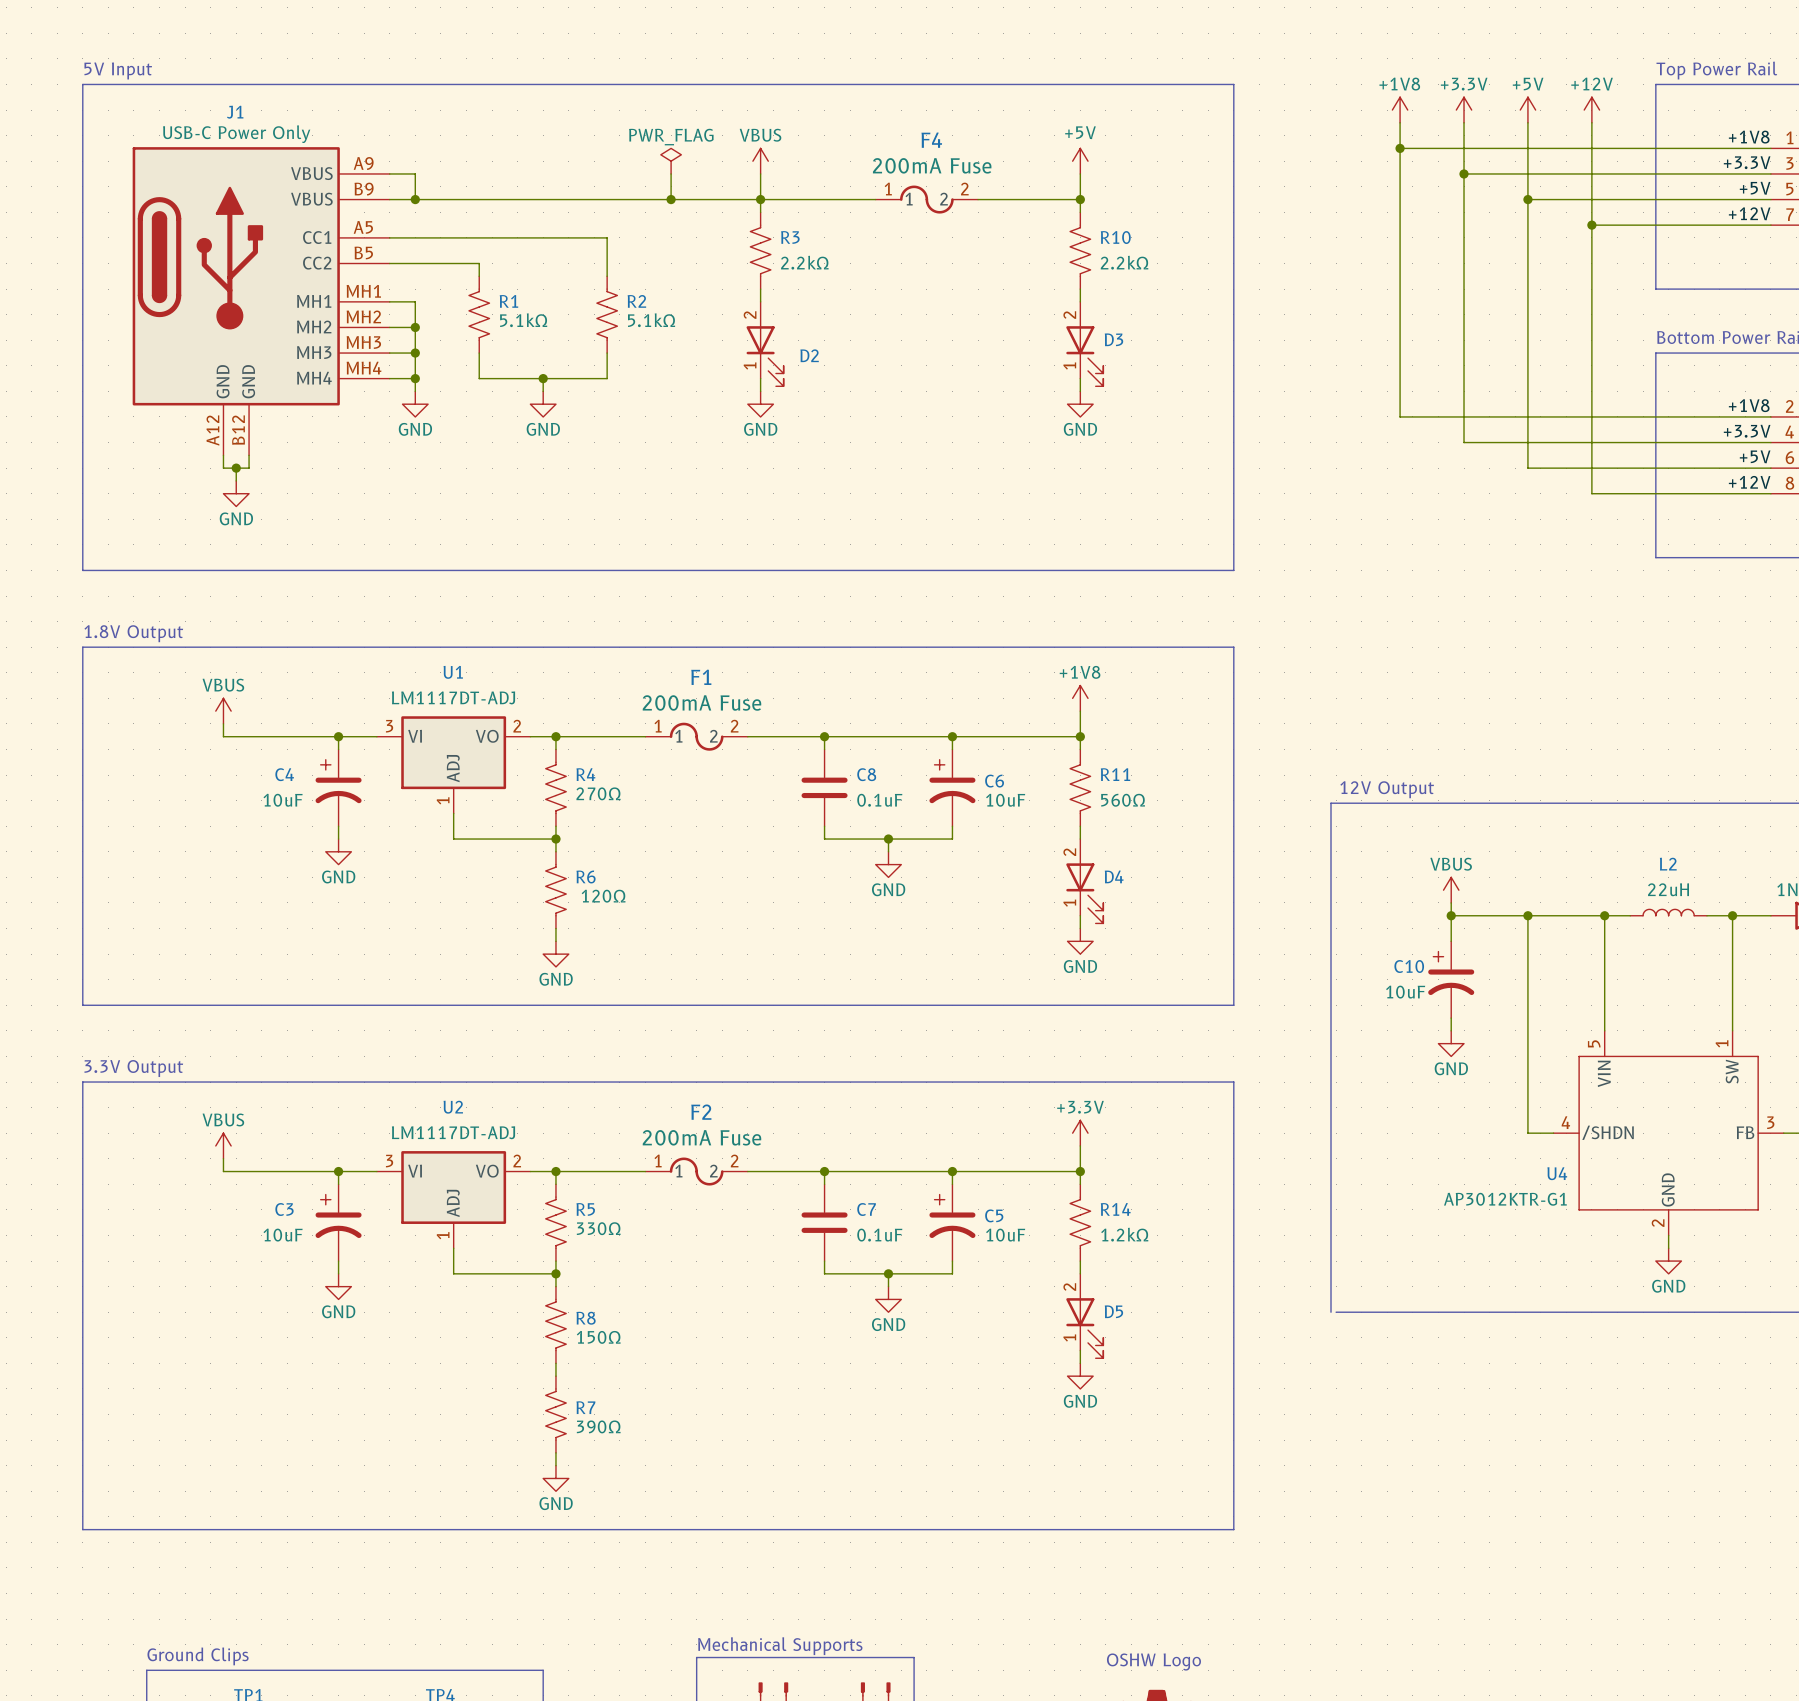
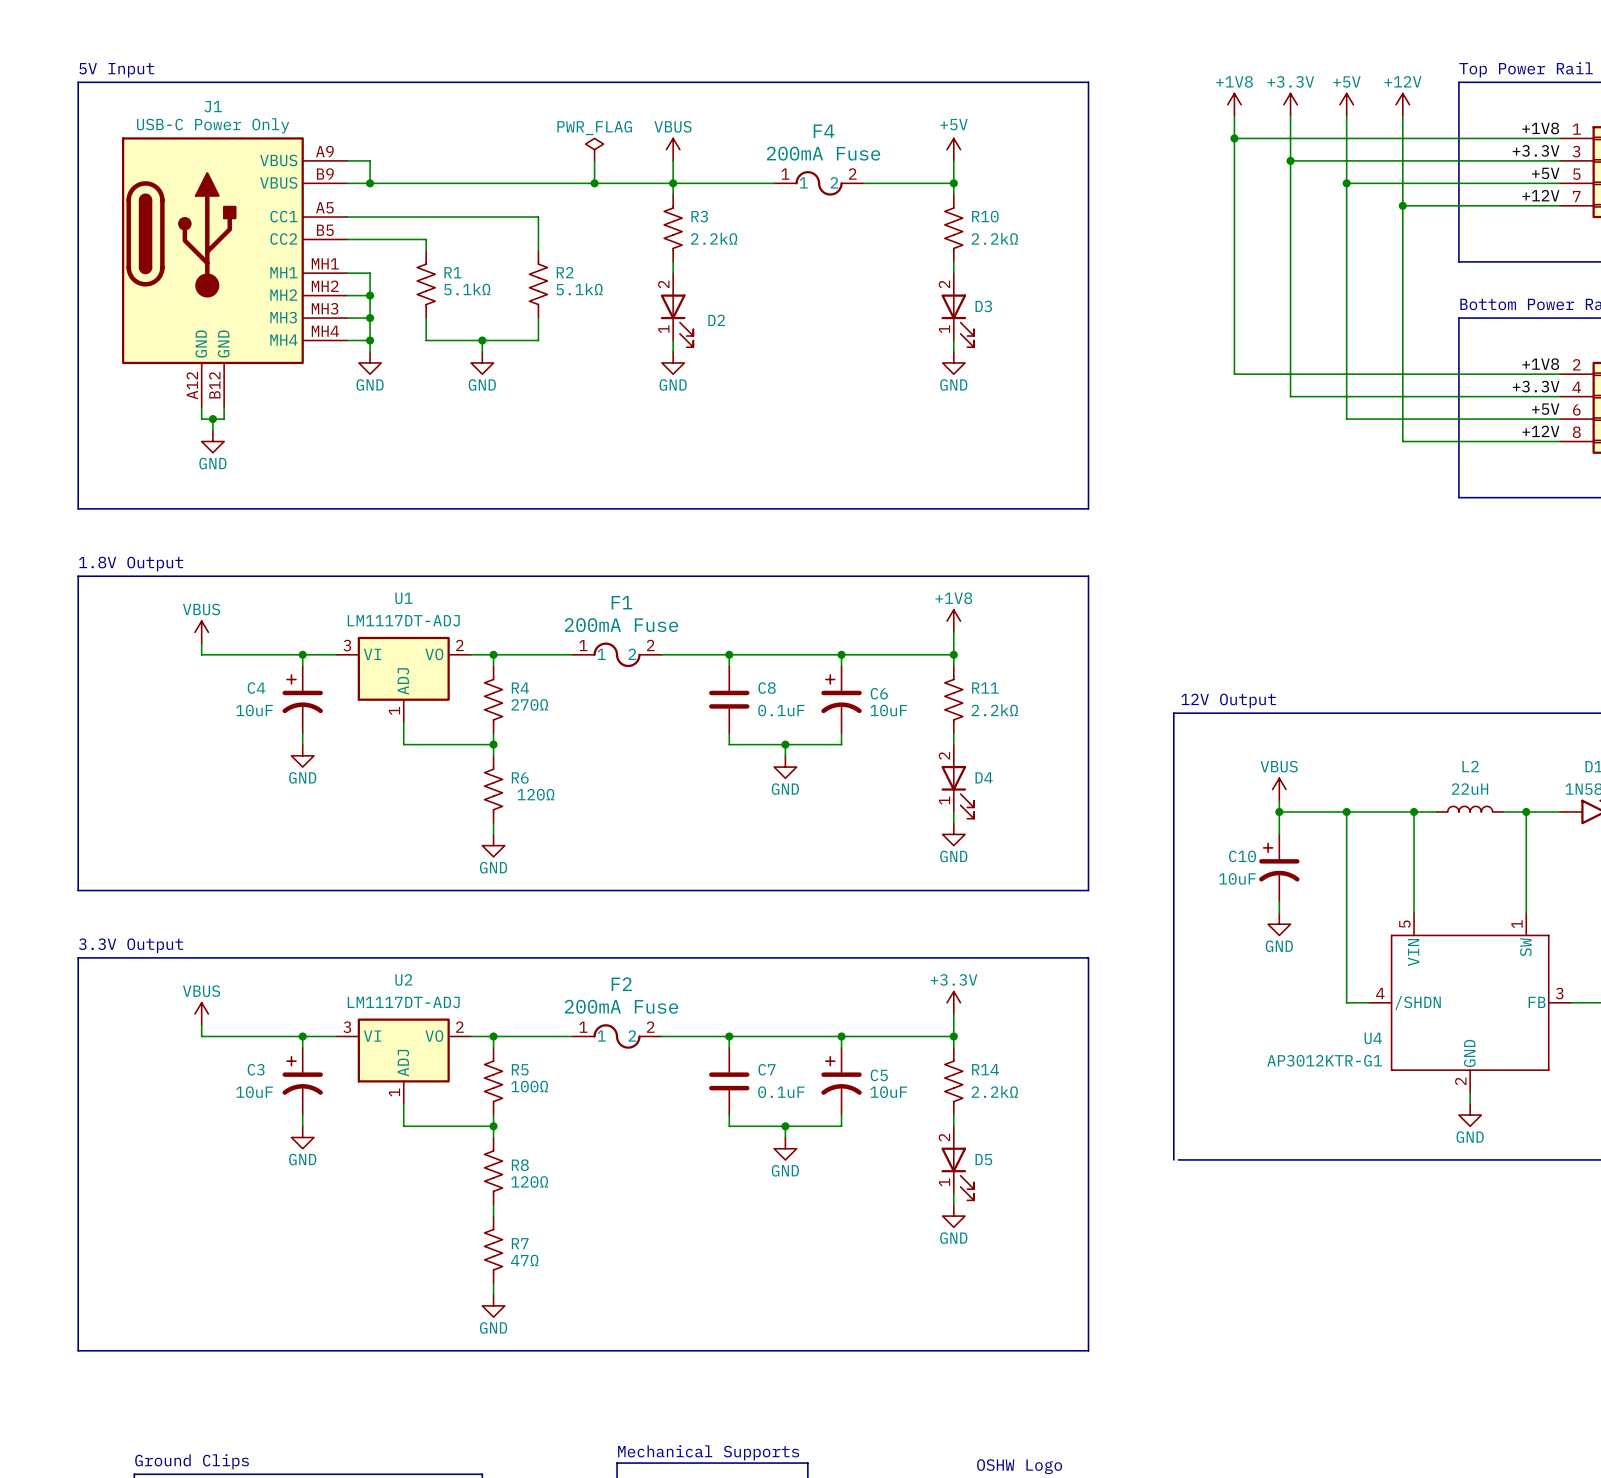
R11 value: 560Ω (1123, 800) -> 2.2kΩ (994, 710)
R5 value: 330Ω (598, 1228) -> 100Ω (529, 1086)
R14 value: 1.2kΩ (1124, 1234) -> 2.2kΩ (994, 1091)
R8 value: 150Ω (598, 1337) -> 120Ω (529, 1181)
R7 value: 390Ω (598, 1426) -> 47Ω (524, 1260)

